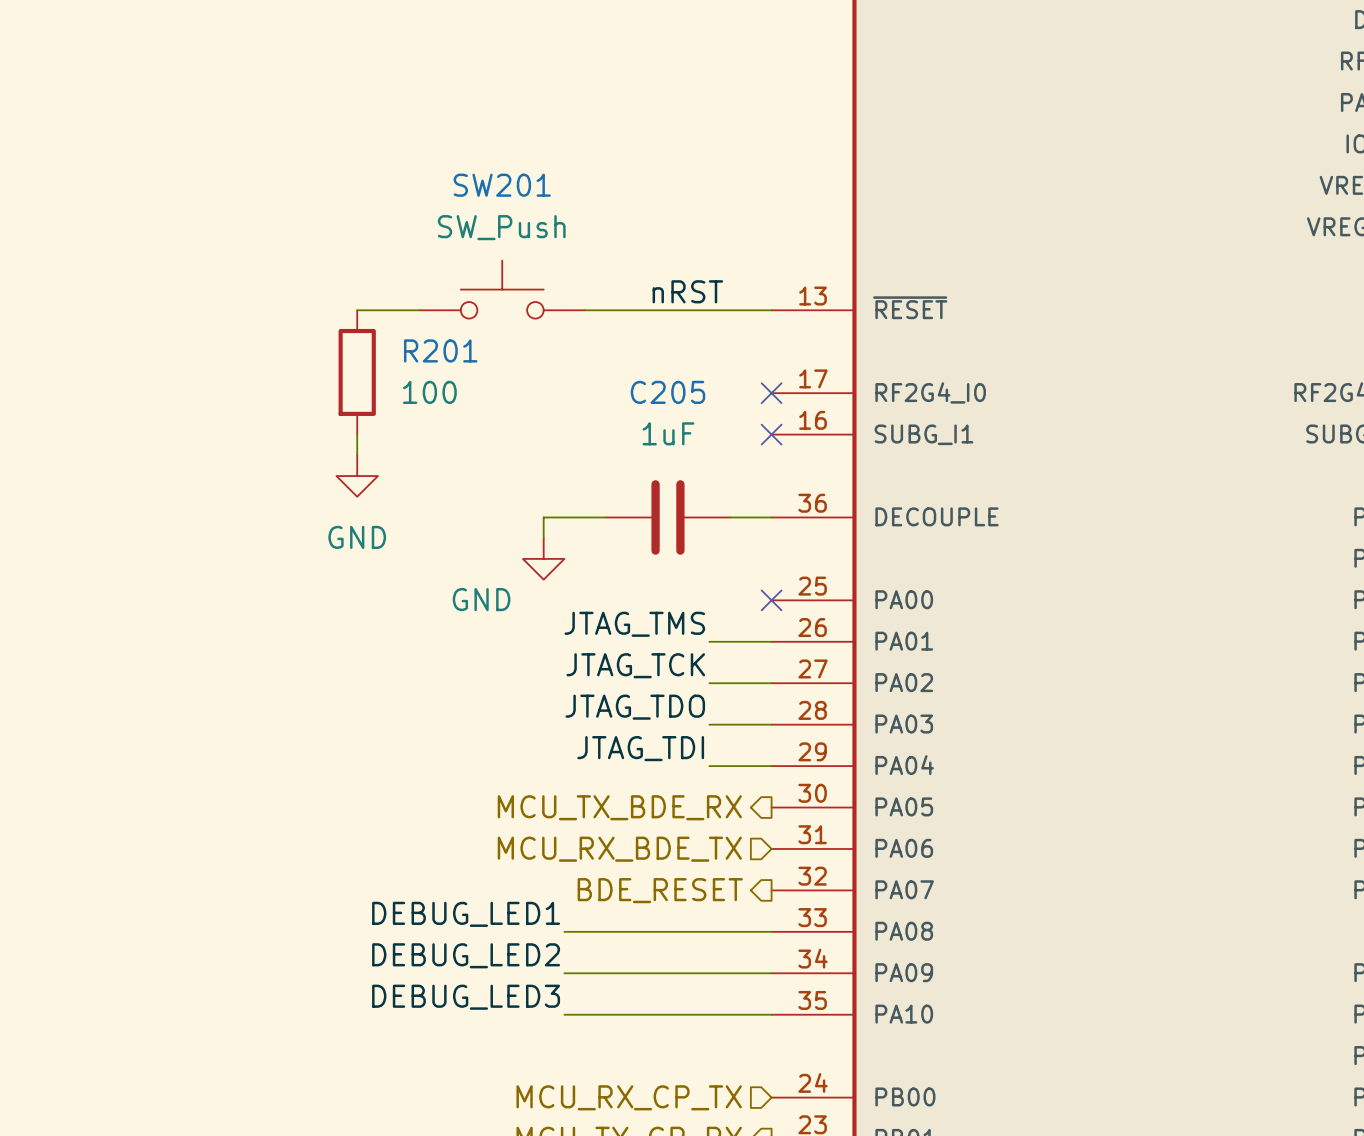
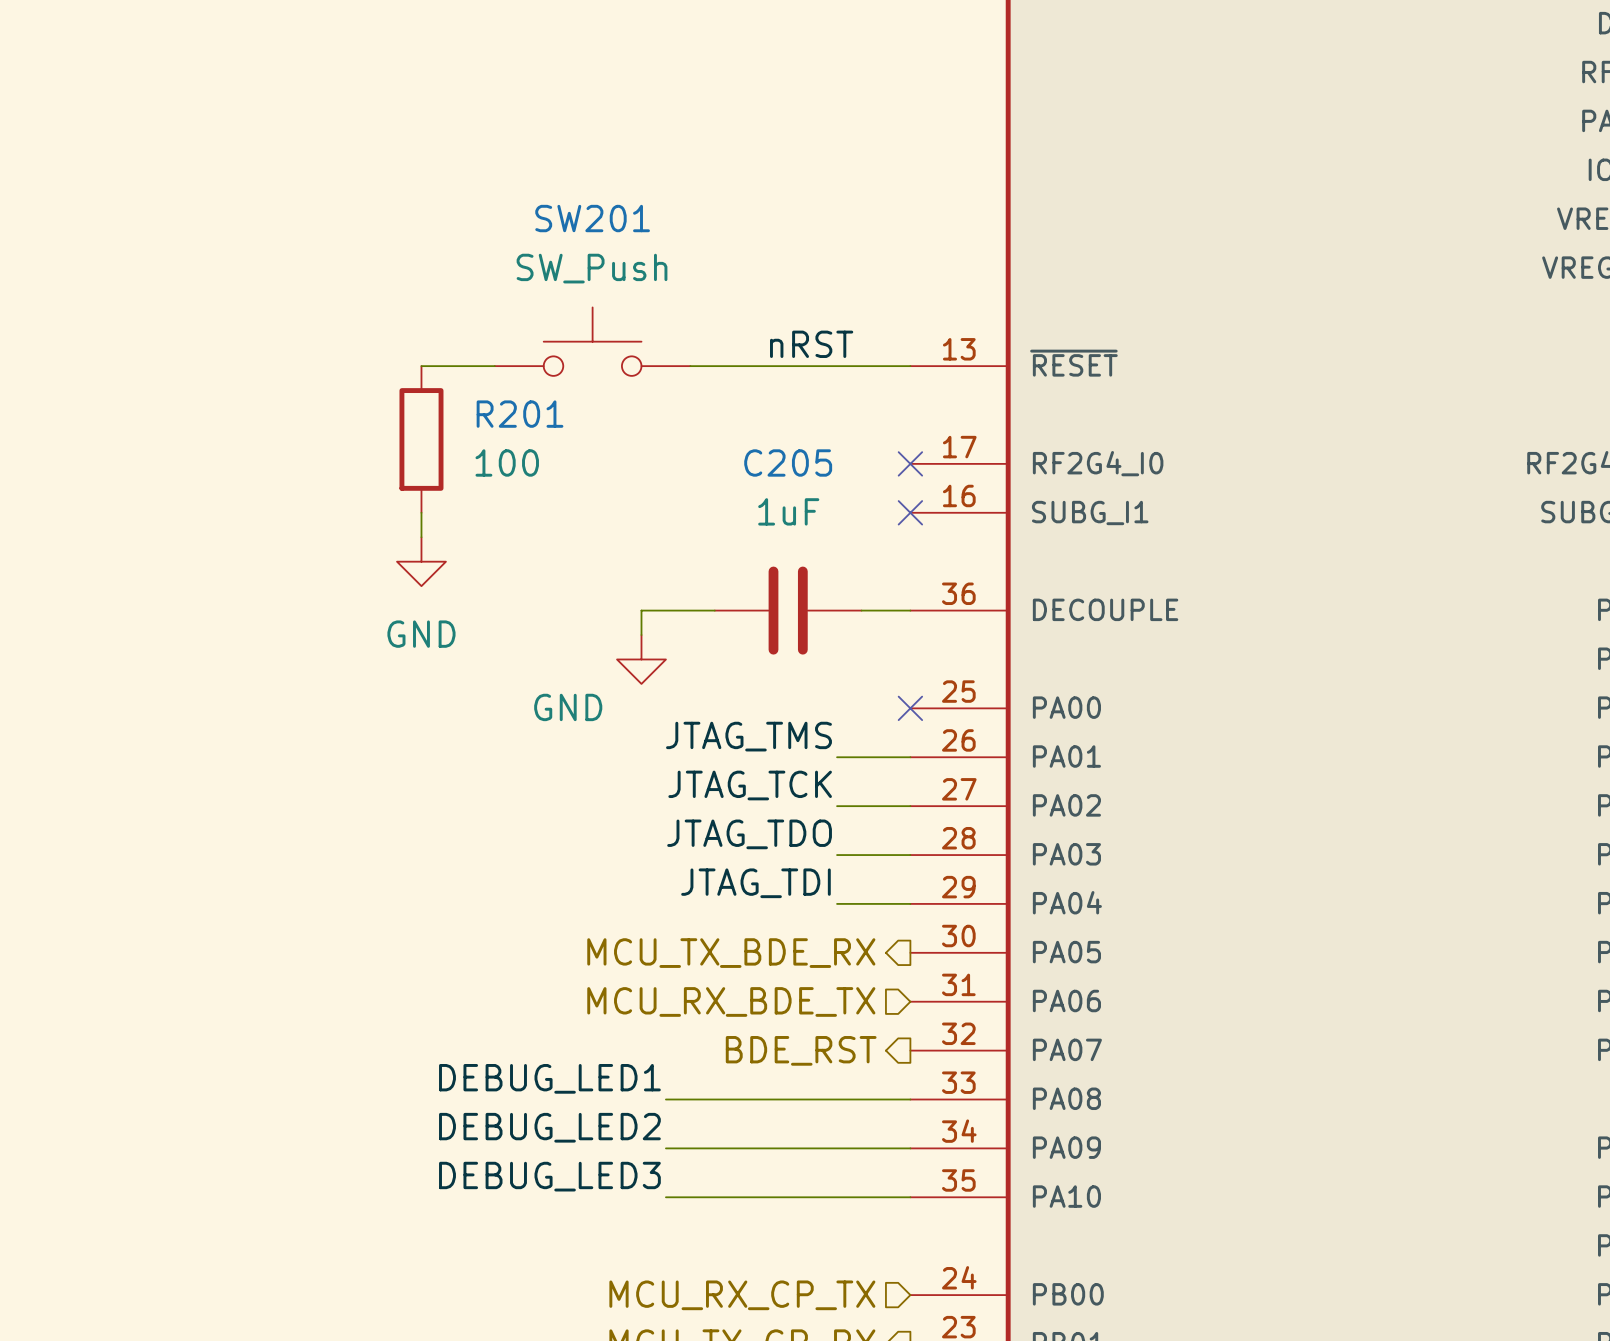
hierarchical label: BDE_RESET (660, 890) -> BDE_RST (801, 1050)

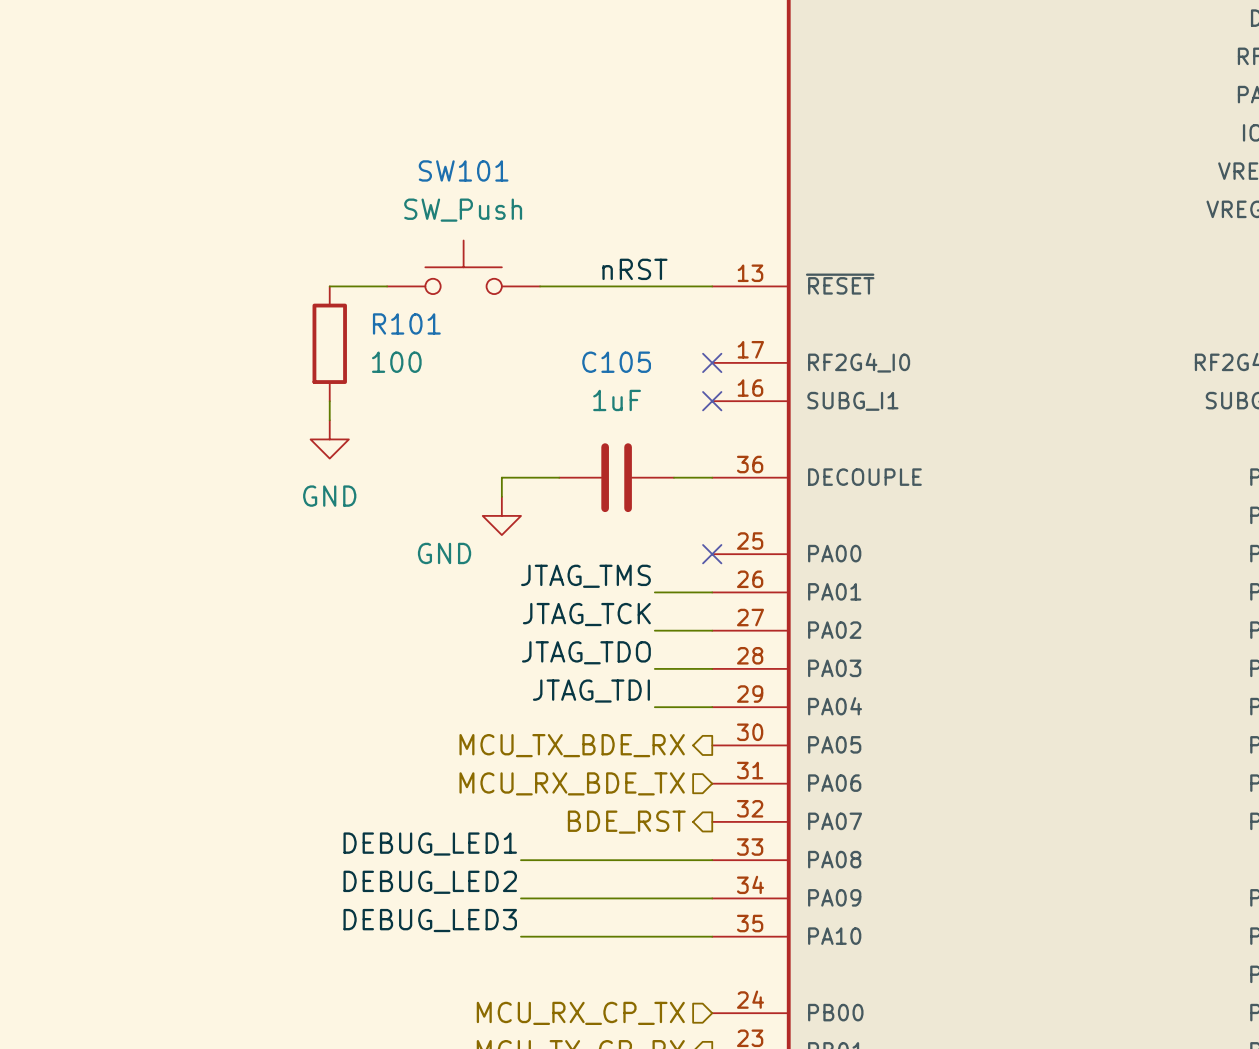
SW201 name: SW201 (592, 218) -> SW101 (463, 170)
R201 name: R201 (520, 414) -> R101 (406, 323)
C205 name: C205 (788, 462) -> C105 (616, 362)

